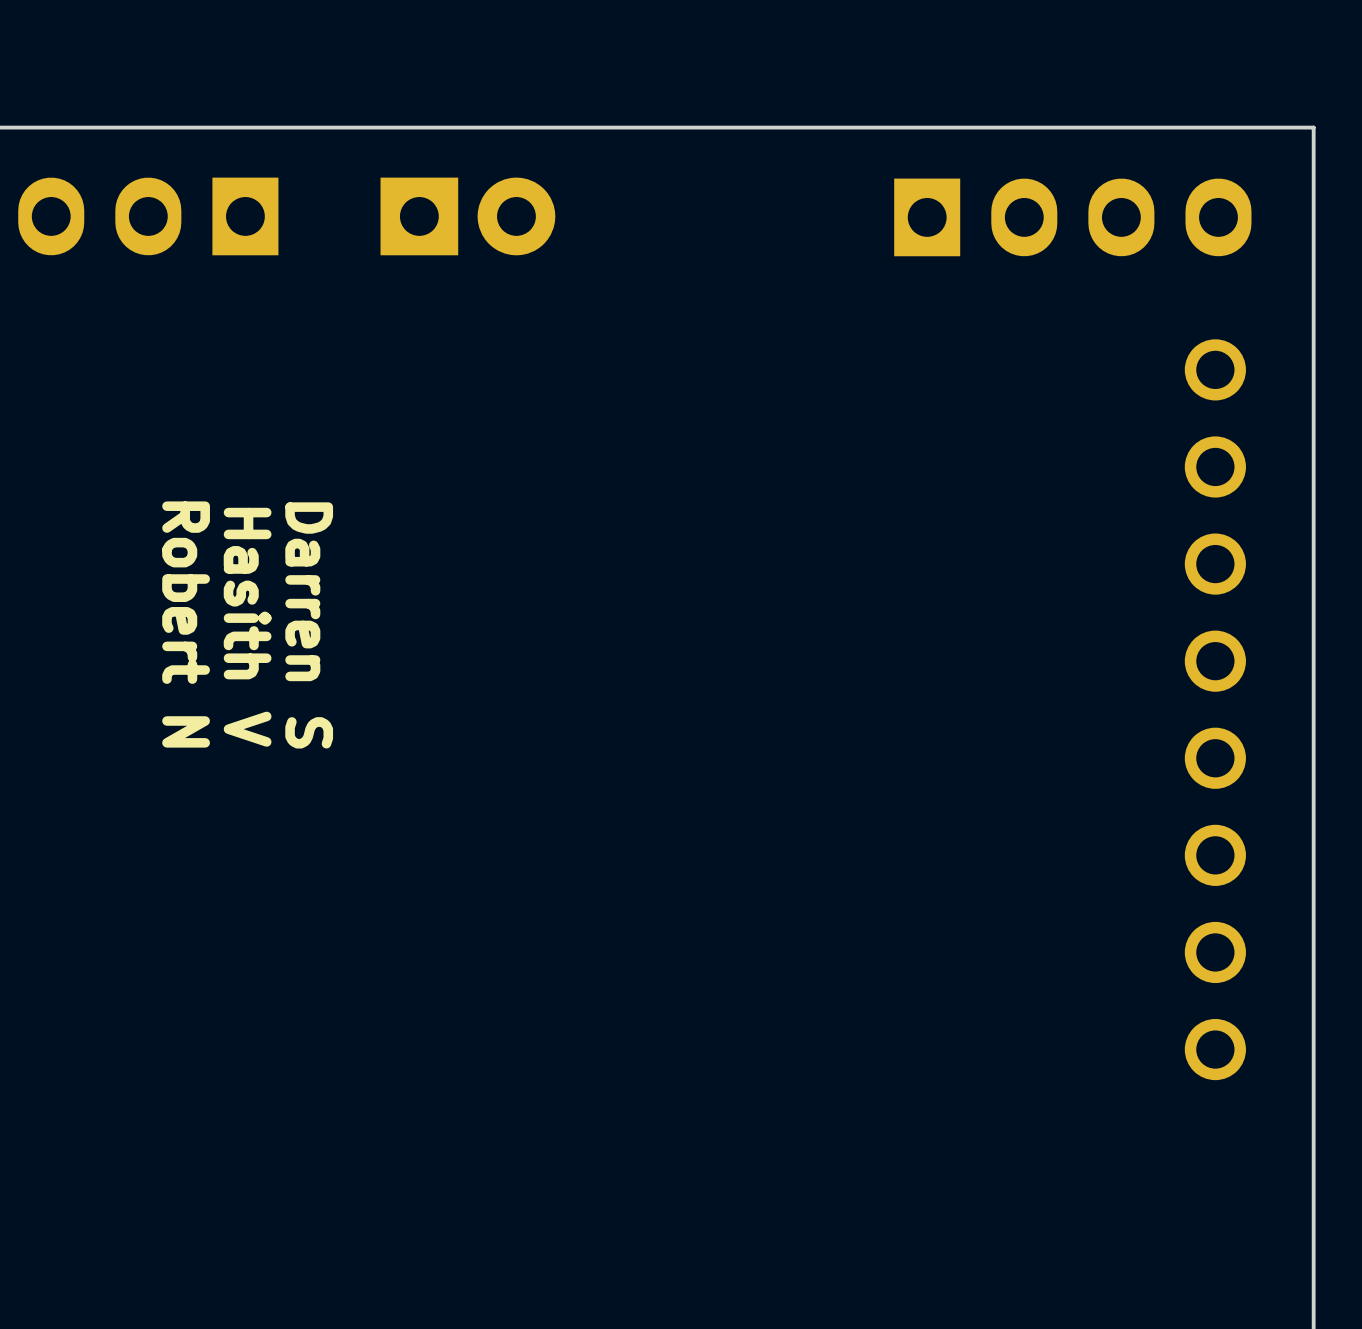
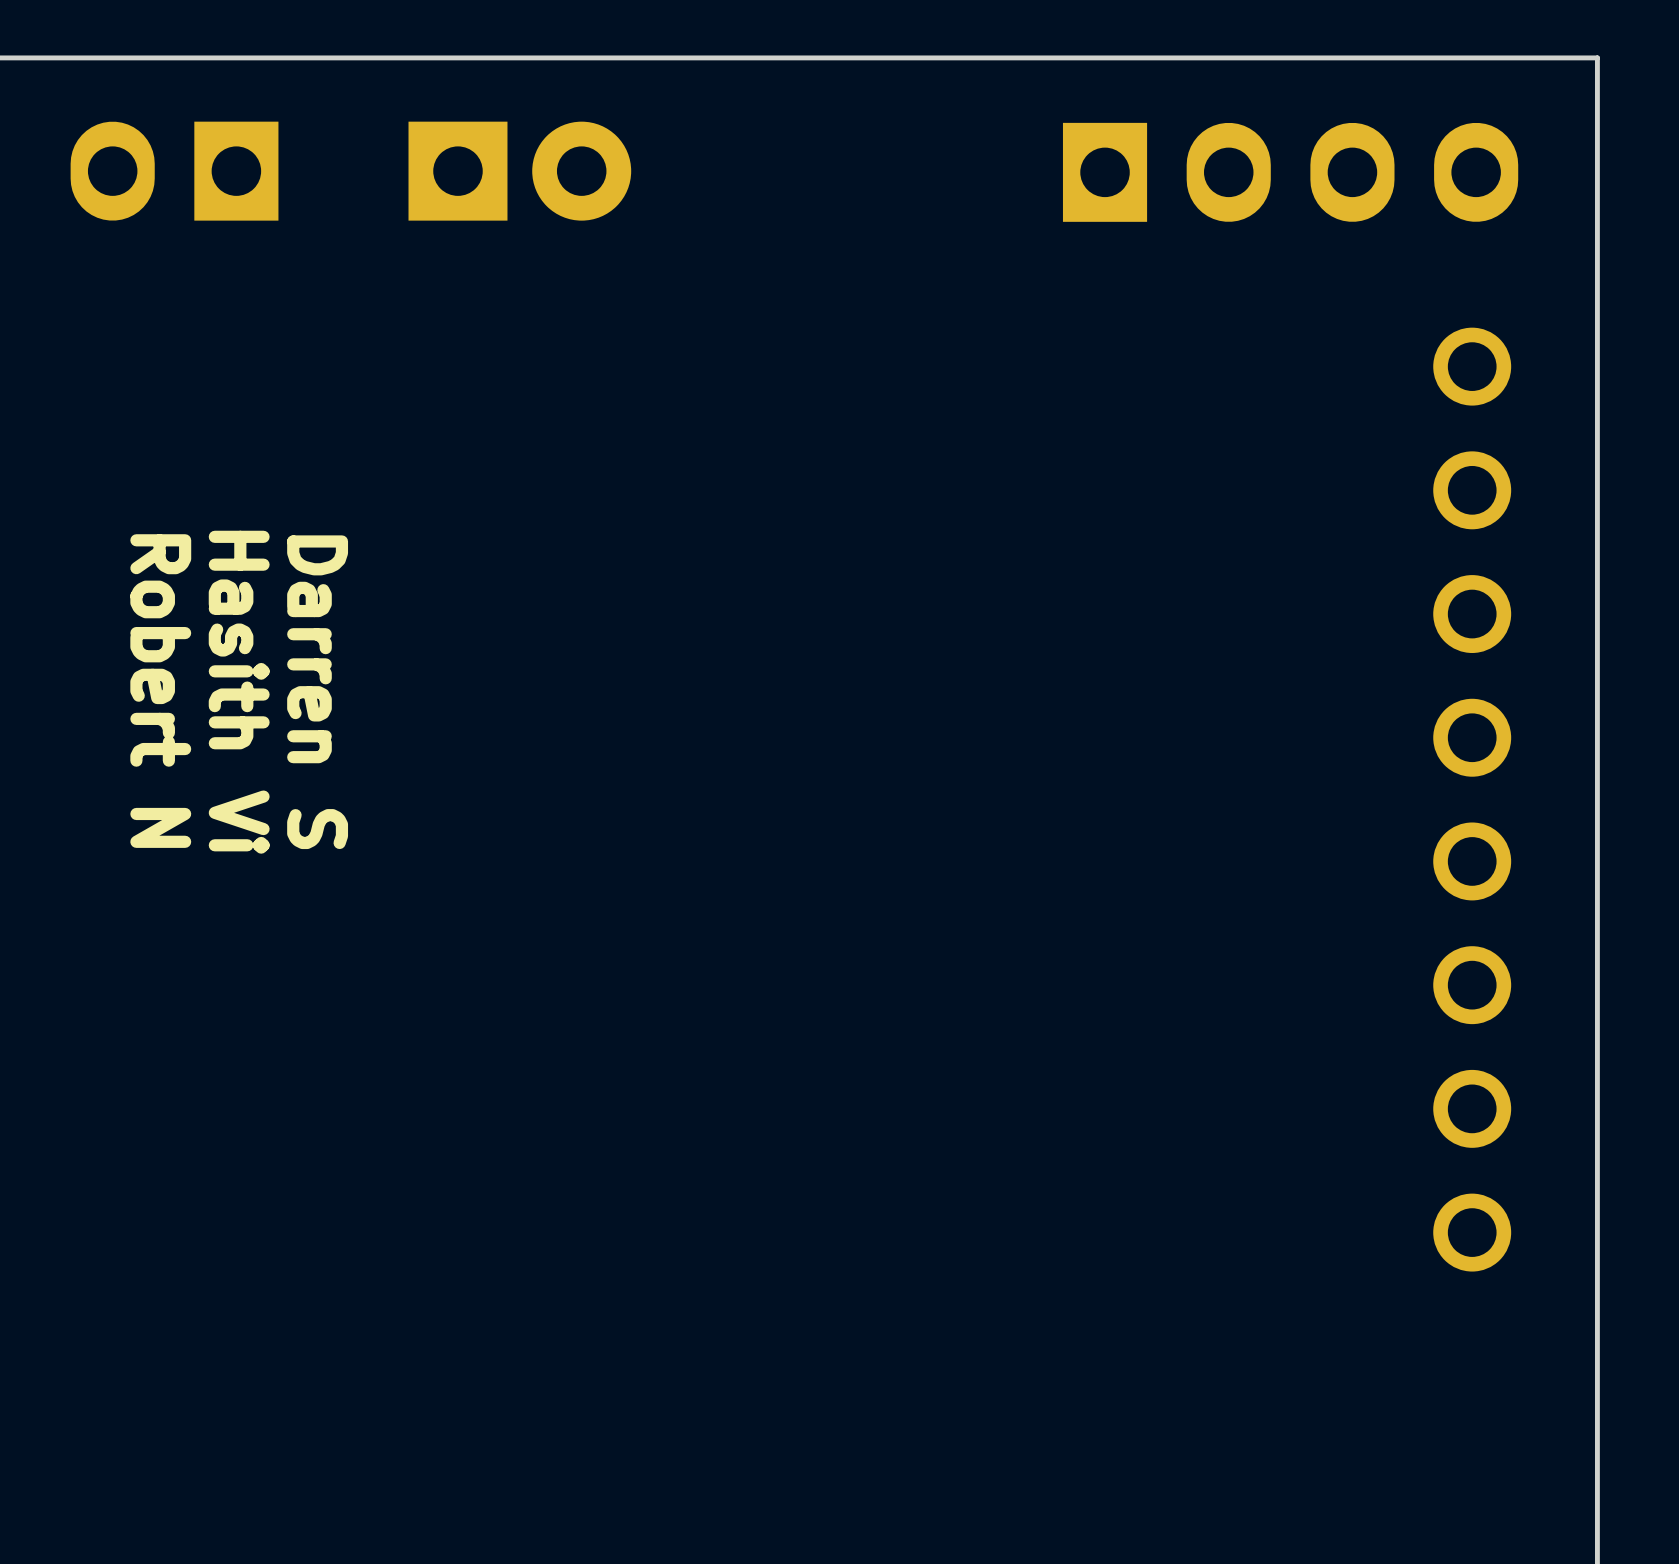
text: Hasith V (247, 627) -> Hasith Vi (239, 692)

